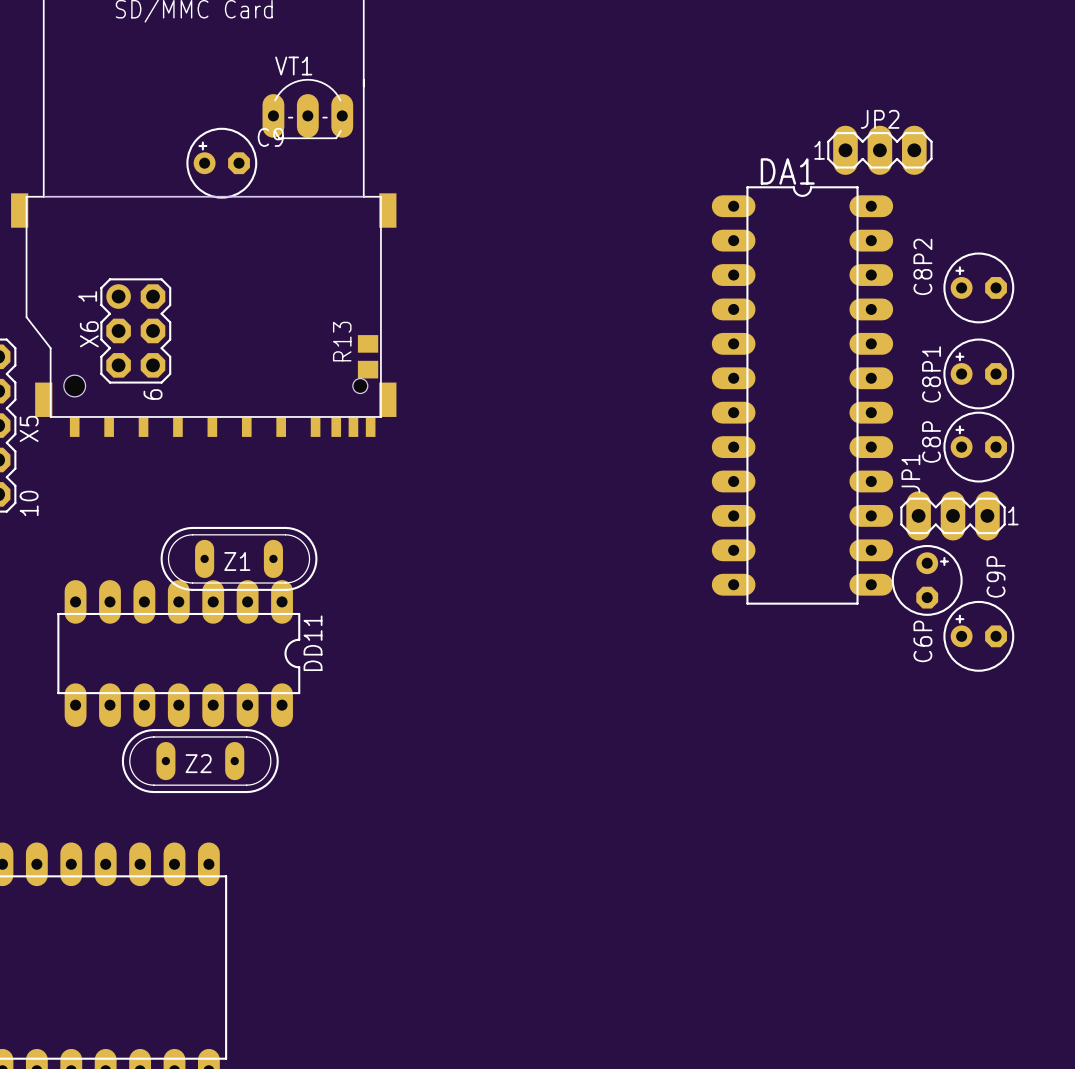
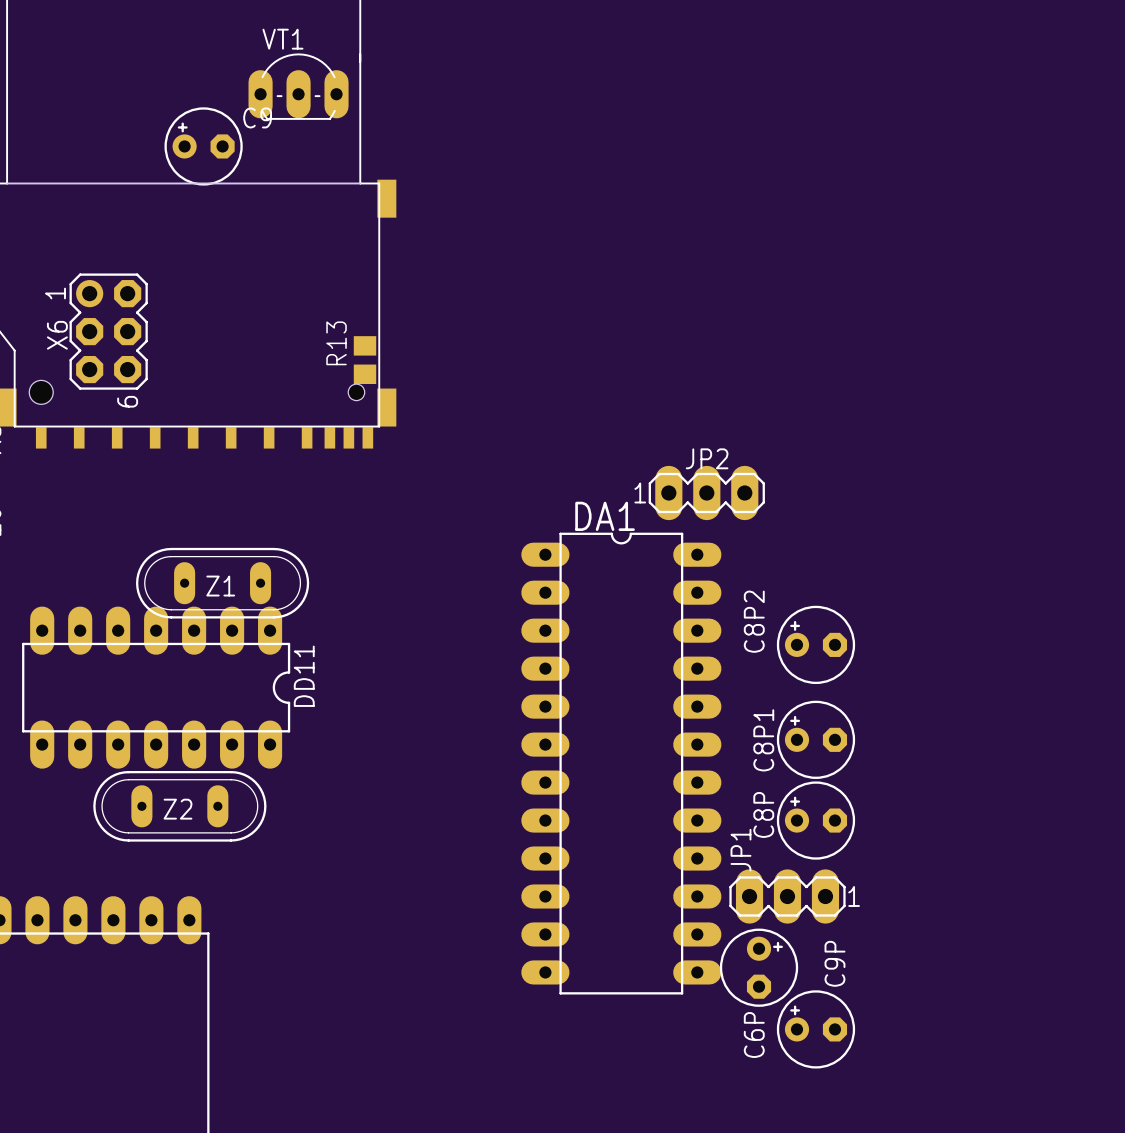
JP2 position: (879, 150) -> (706, 492)
C8P2 position: (978, 287) -> (815, 644)
C8P1 position: (978, 373) -> (815, 739)
DA1 position: (802, 395) -> (621, 763)
C8P position: (978, 447) -> (815, 820)
JP1 position: (953, 515) -> (787, 896)
C6P position: (927, 580) -> (759, 967)
C9P position: (978, 636) -> (815, 1029)

